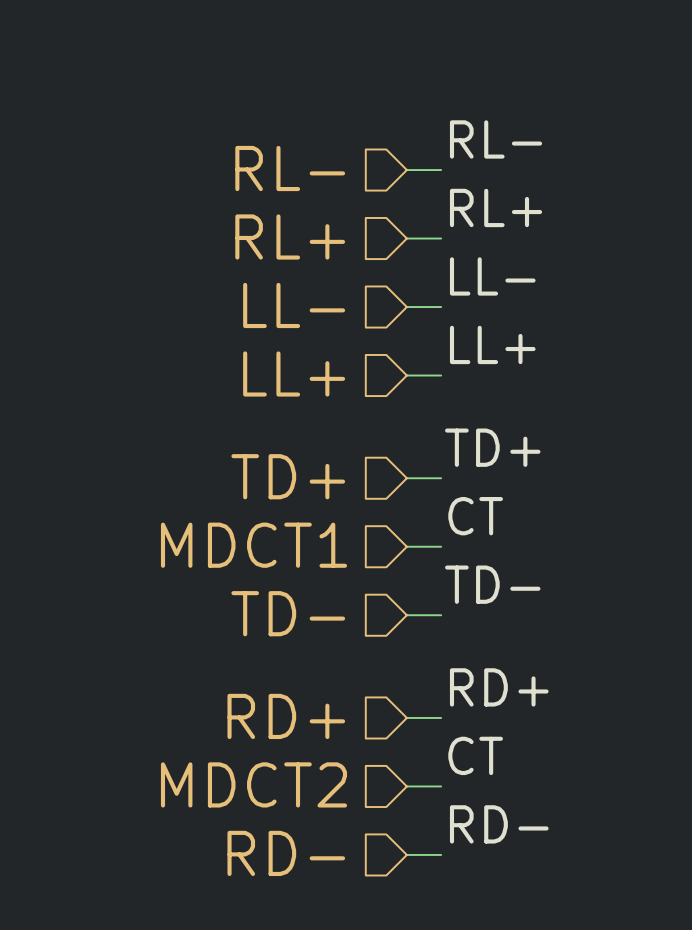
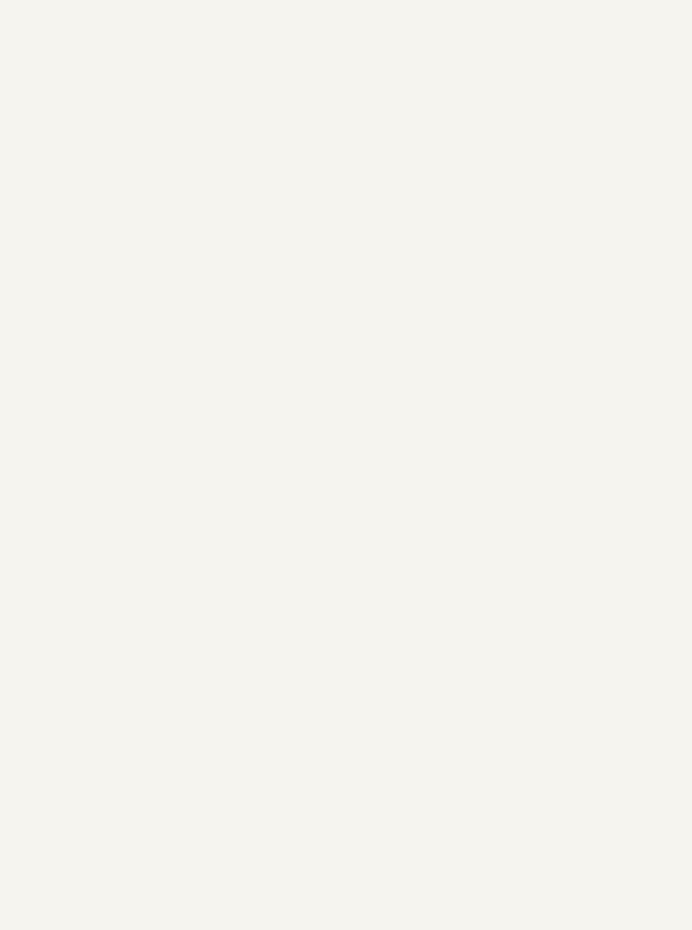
label: RL- (496, 139) -> none
hierarchical label: RL- (290, 168) -> none
wire: (406, 170) (441, 170) -> none
label: RL+ (496, 207) -> none
hierarchical label: RL+ (290, 236) -> none
wire: (406, 238) (441, 238) -> none
label: LL- (492, 276) -> none
hierarchical label: LL- (294, 305) -> none
wire: (406, 307) (441, 307) -> none
label: LL+ (492, 344) -> none
hierarchical label: LL+ (294, 373) -> none
wire: (406, 375) (441, 375) -> none
label: TD+ (492, 447) -> none
hierarchical label: TD+ (288, 476) -> none
wire: (406, 478) (441, 478) -> none
label: CT (475, 516) -> none
hierarchical label: MDCT1 (253, 545) -> none
wire: (406, 546) (441, 546) -> none
label: TD- (492, 584) -> none
hierarchical label: TD- (288, 613) -> none
wire: (406, 615) (441, 615) -> none
label: RD+ (499, 687) -> none
hierarchical label: RD+ (286, 716) -> none
wire: (406, 717) (441, 717) -> none
label: CT (475, 755) -> none
hierarchical label: MDCT2 (253, 784) -> none
wire: (406, 786) (441, 786) -> none
label: RD- (499, 824) -> none
hierarchical label: RD- (286, 853) -> none
wire: (406, 854) (441, 854) -> none

